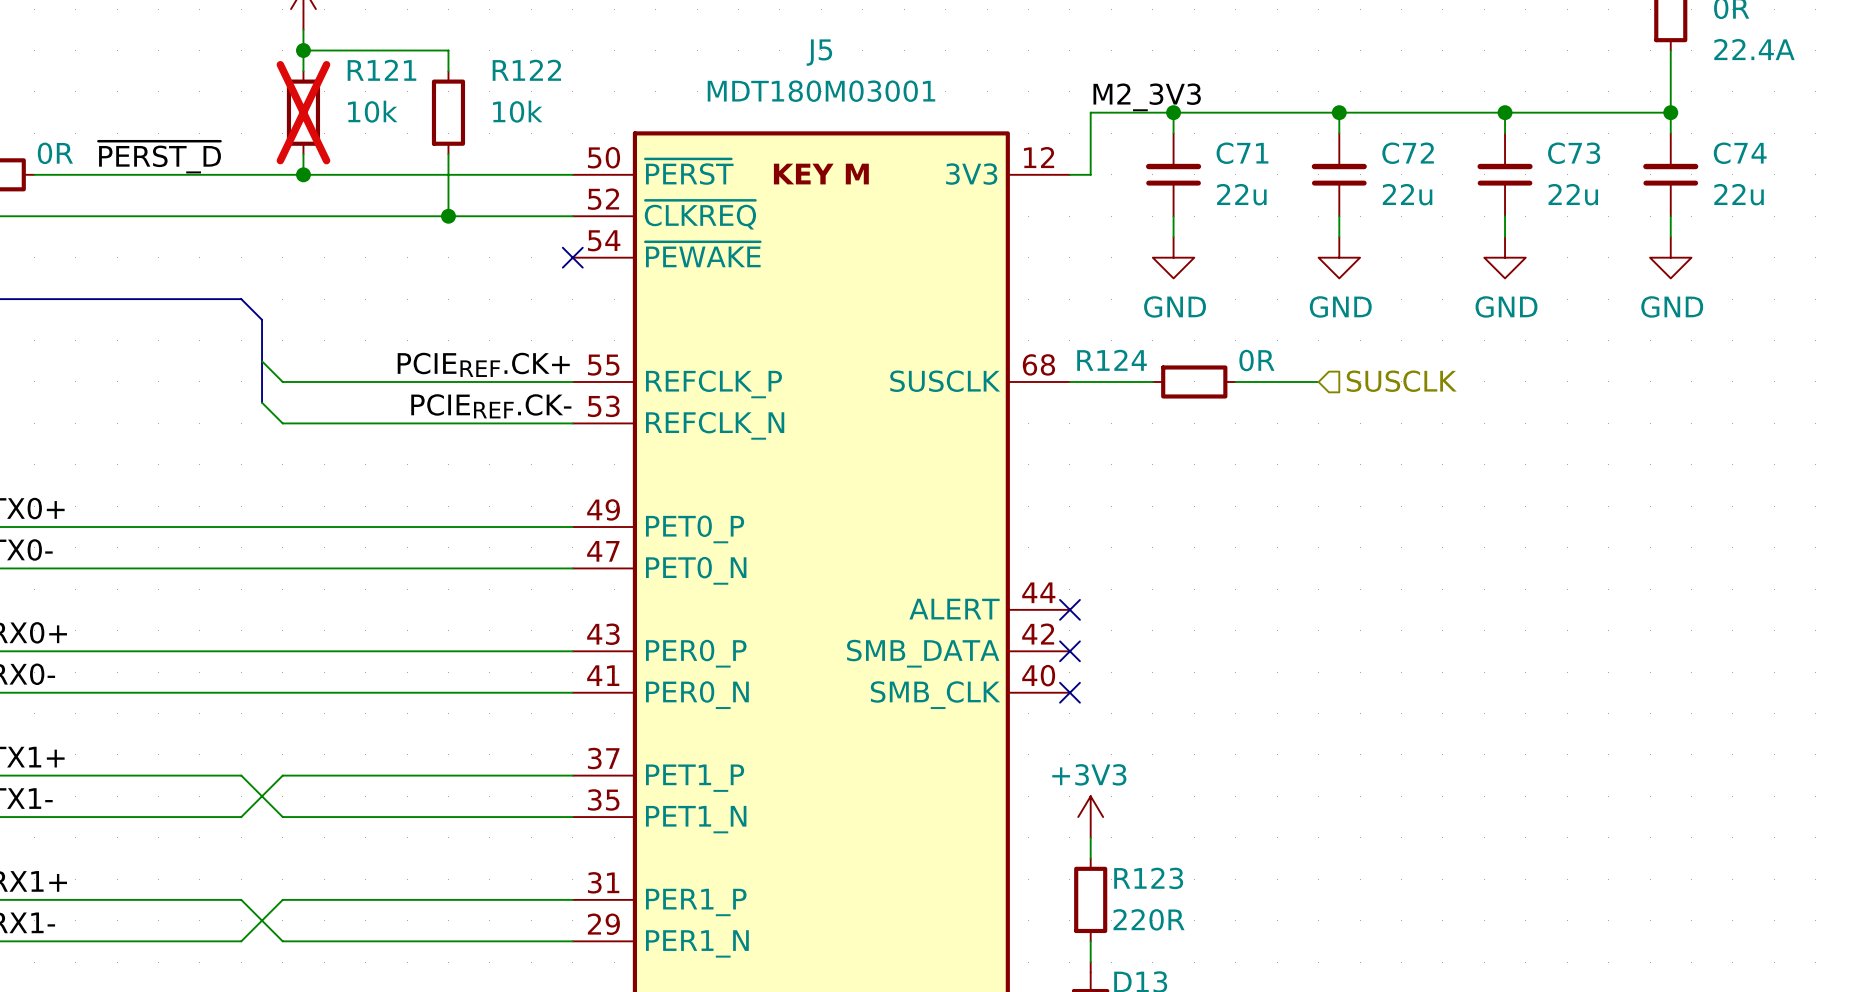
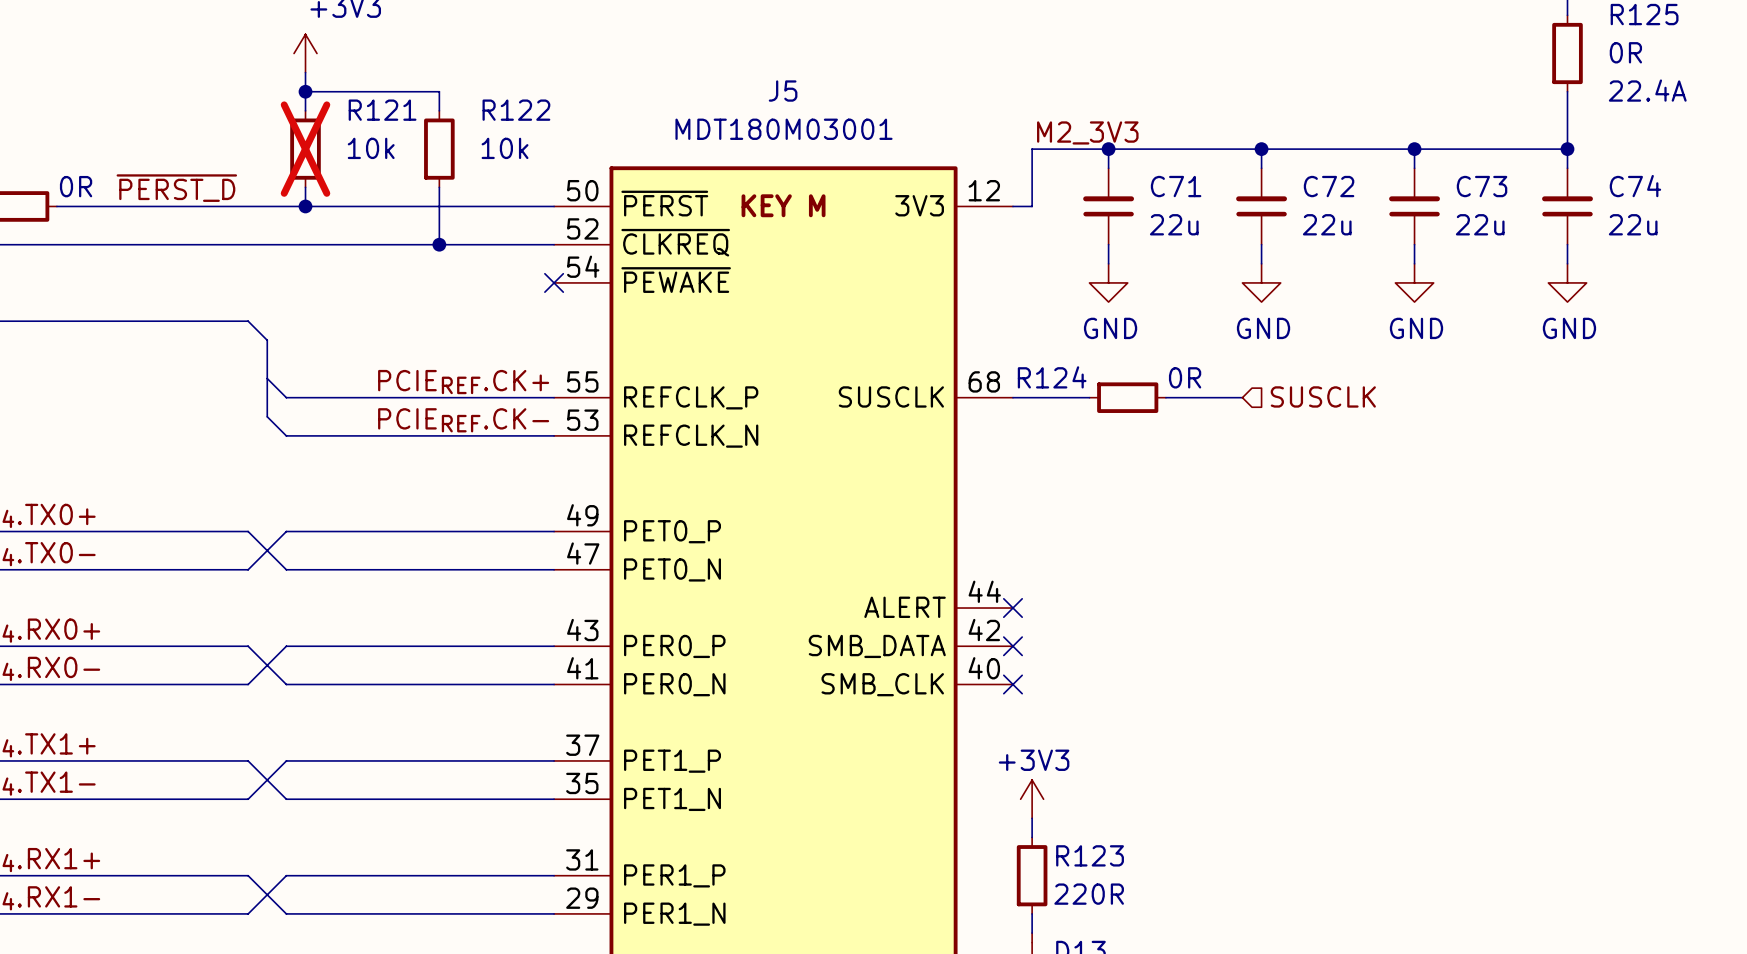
wire: (241, 527) (282, 527) -> (248, 531) (286, 569)
wire: (241, 568) (282, 568) -> (248, 569) (286, 531)
wire: (241, 651) (282, 651) -> (248, 646) (286, 684)
wire: (241, 692) (282, 692) -> (248, 684) (286, 646)

